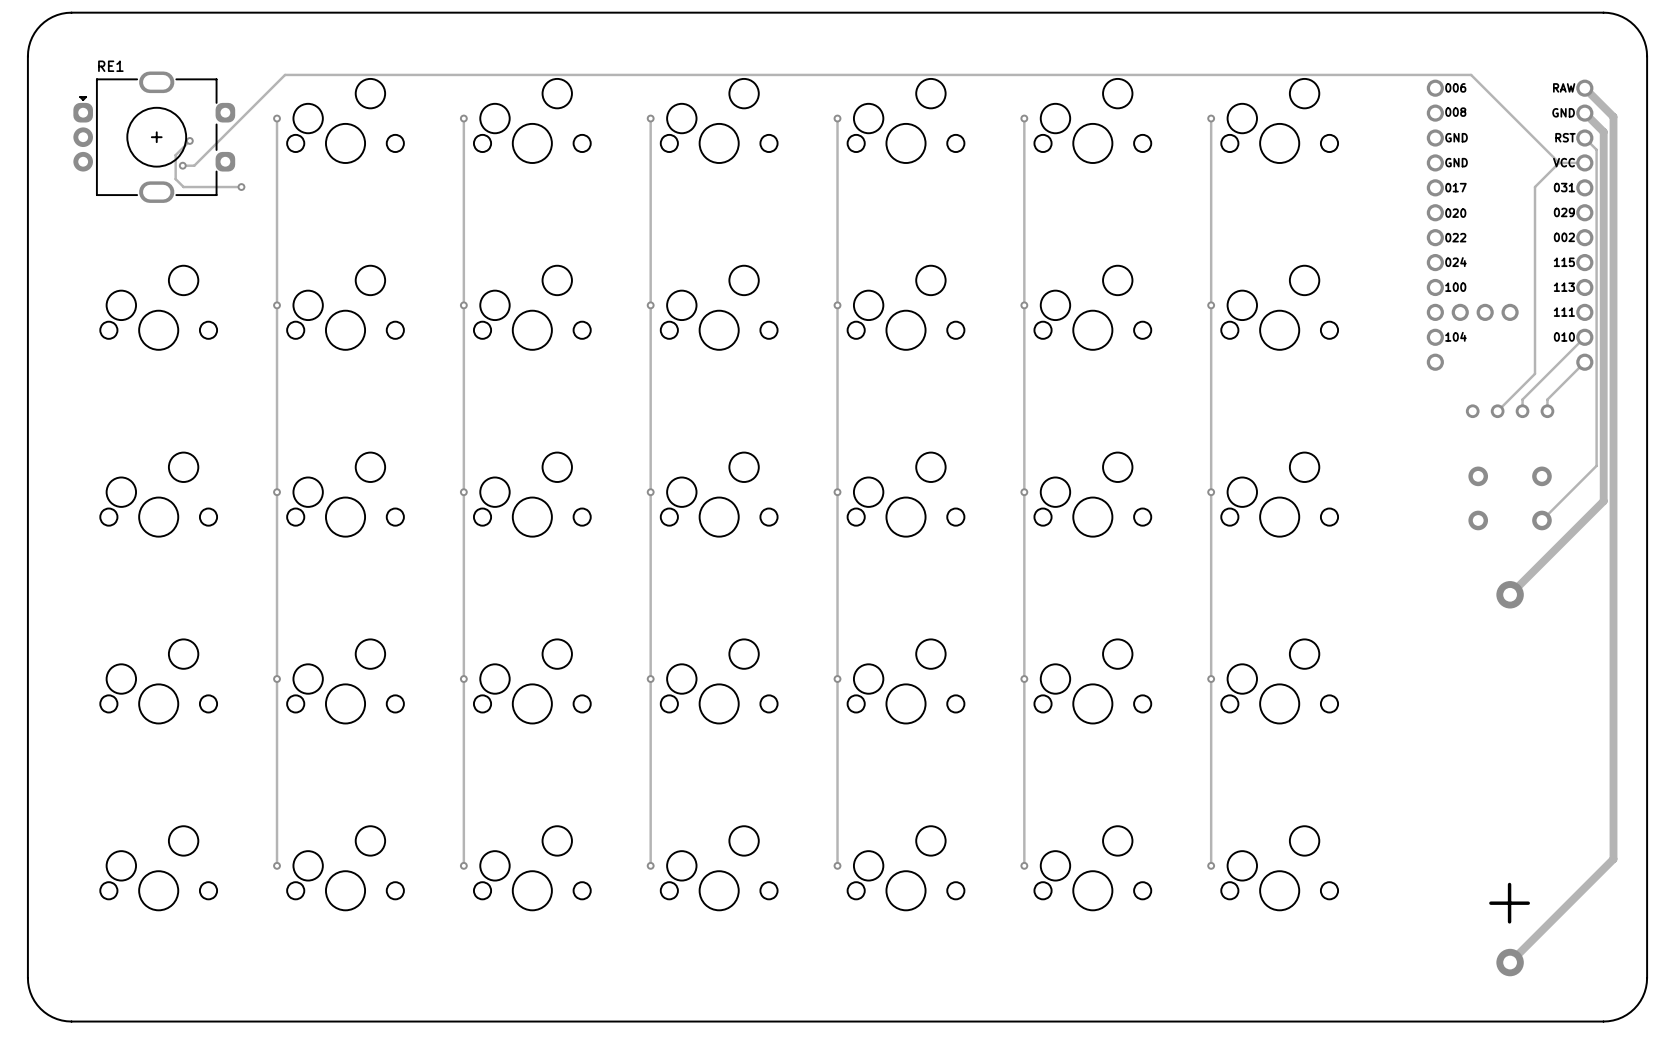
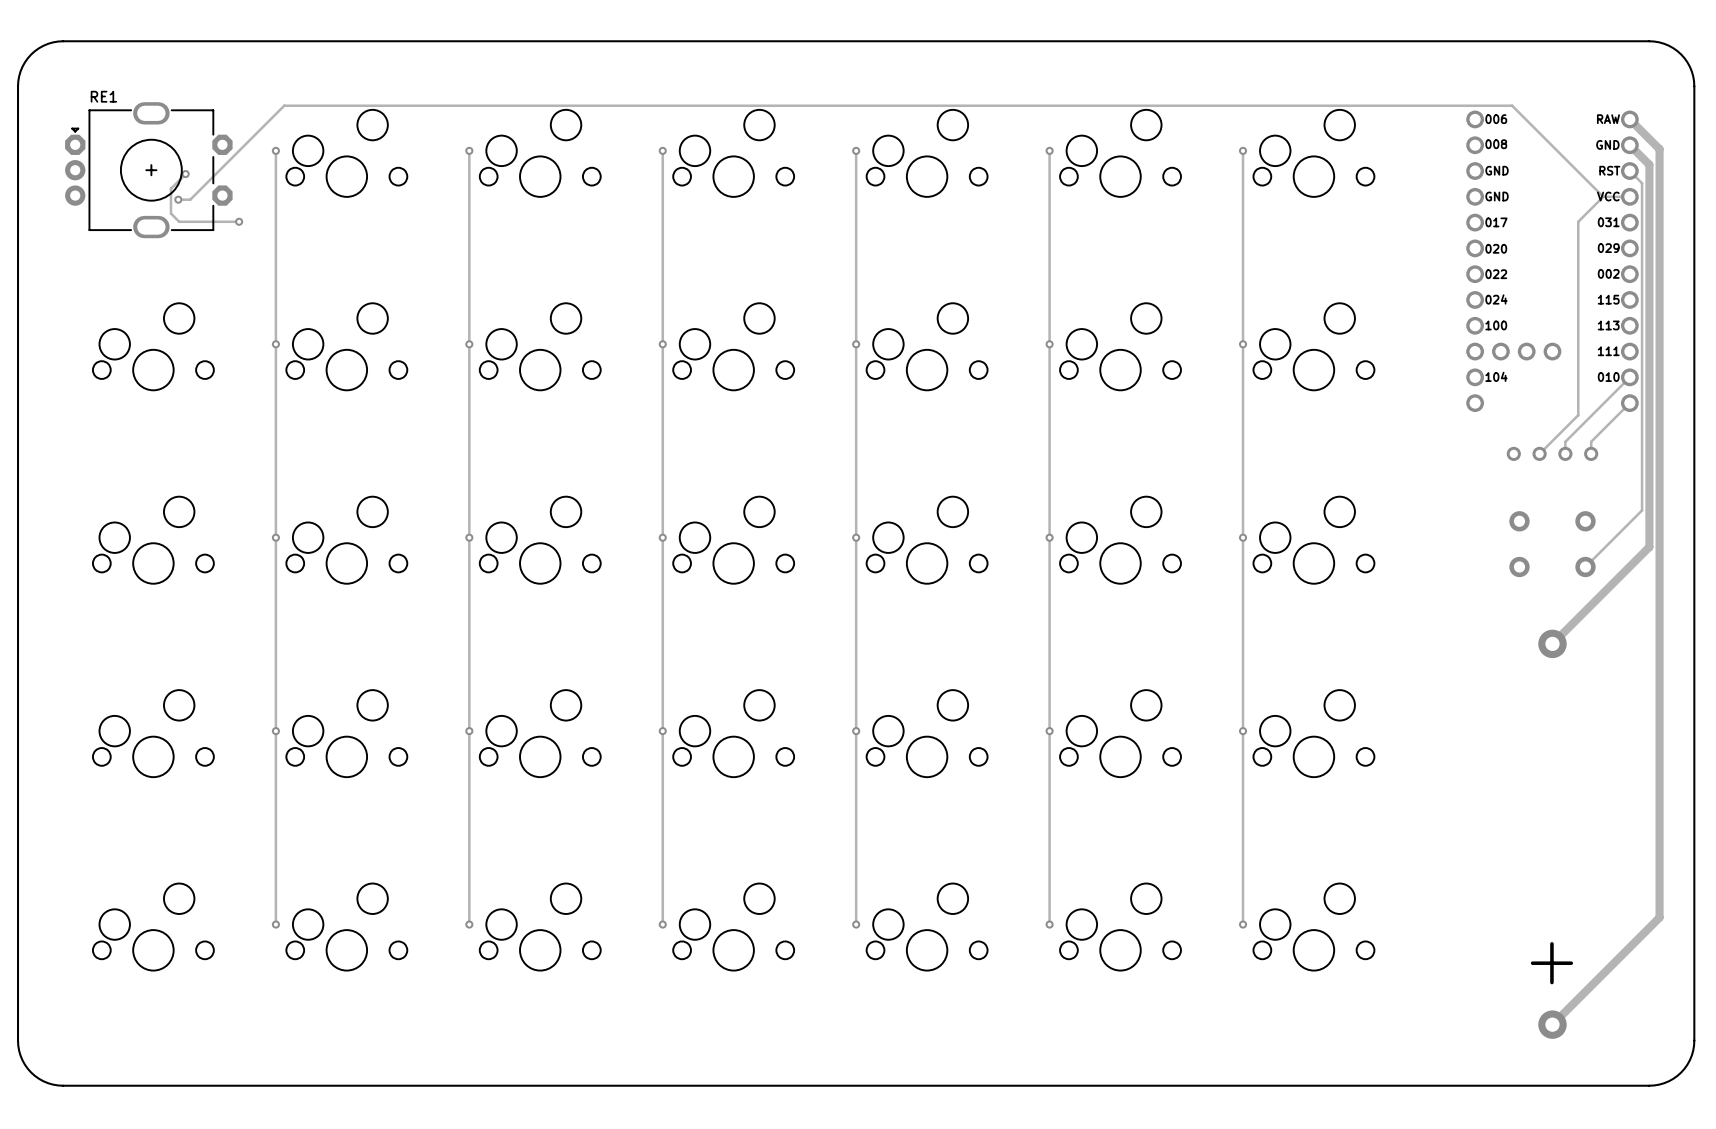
RE1 footprint: [73, 71, 236, 203] -> [65, 102, 233, 239]

